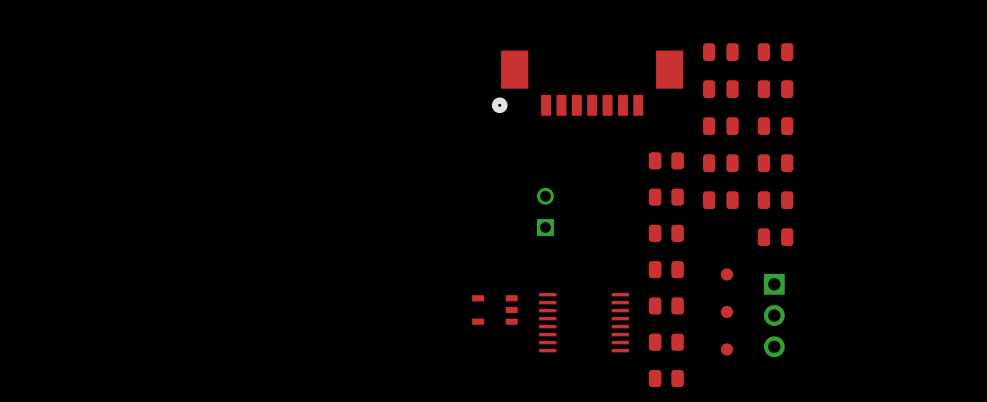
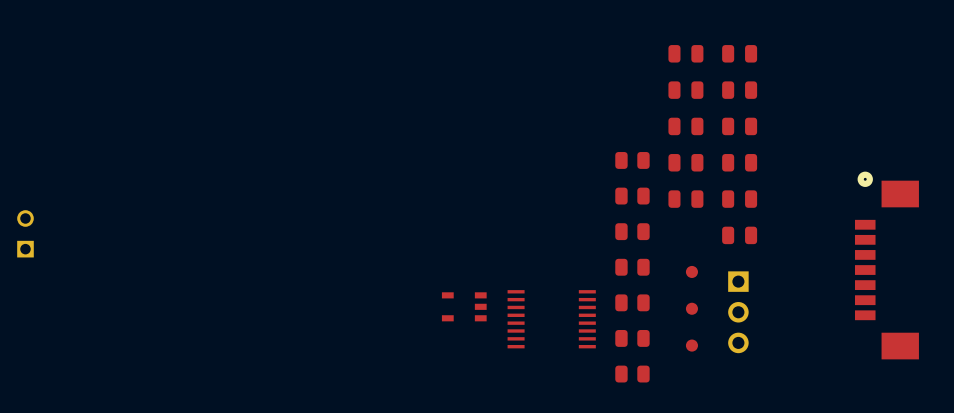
part: (587, 83) -> none
part: (545, 211) -> none
part: none -> (25, 233)
part: none -> (886, 265)

